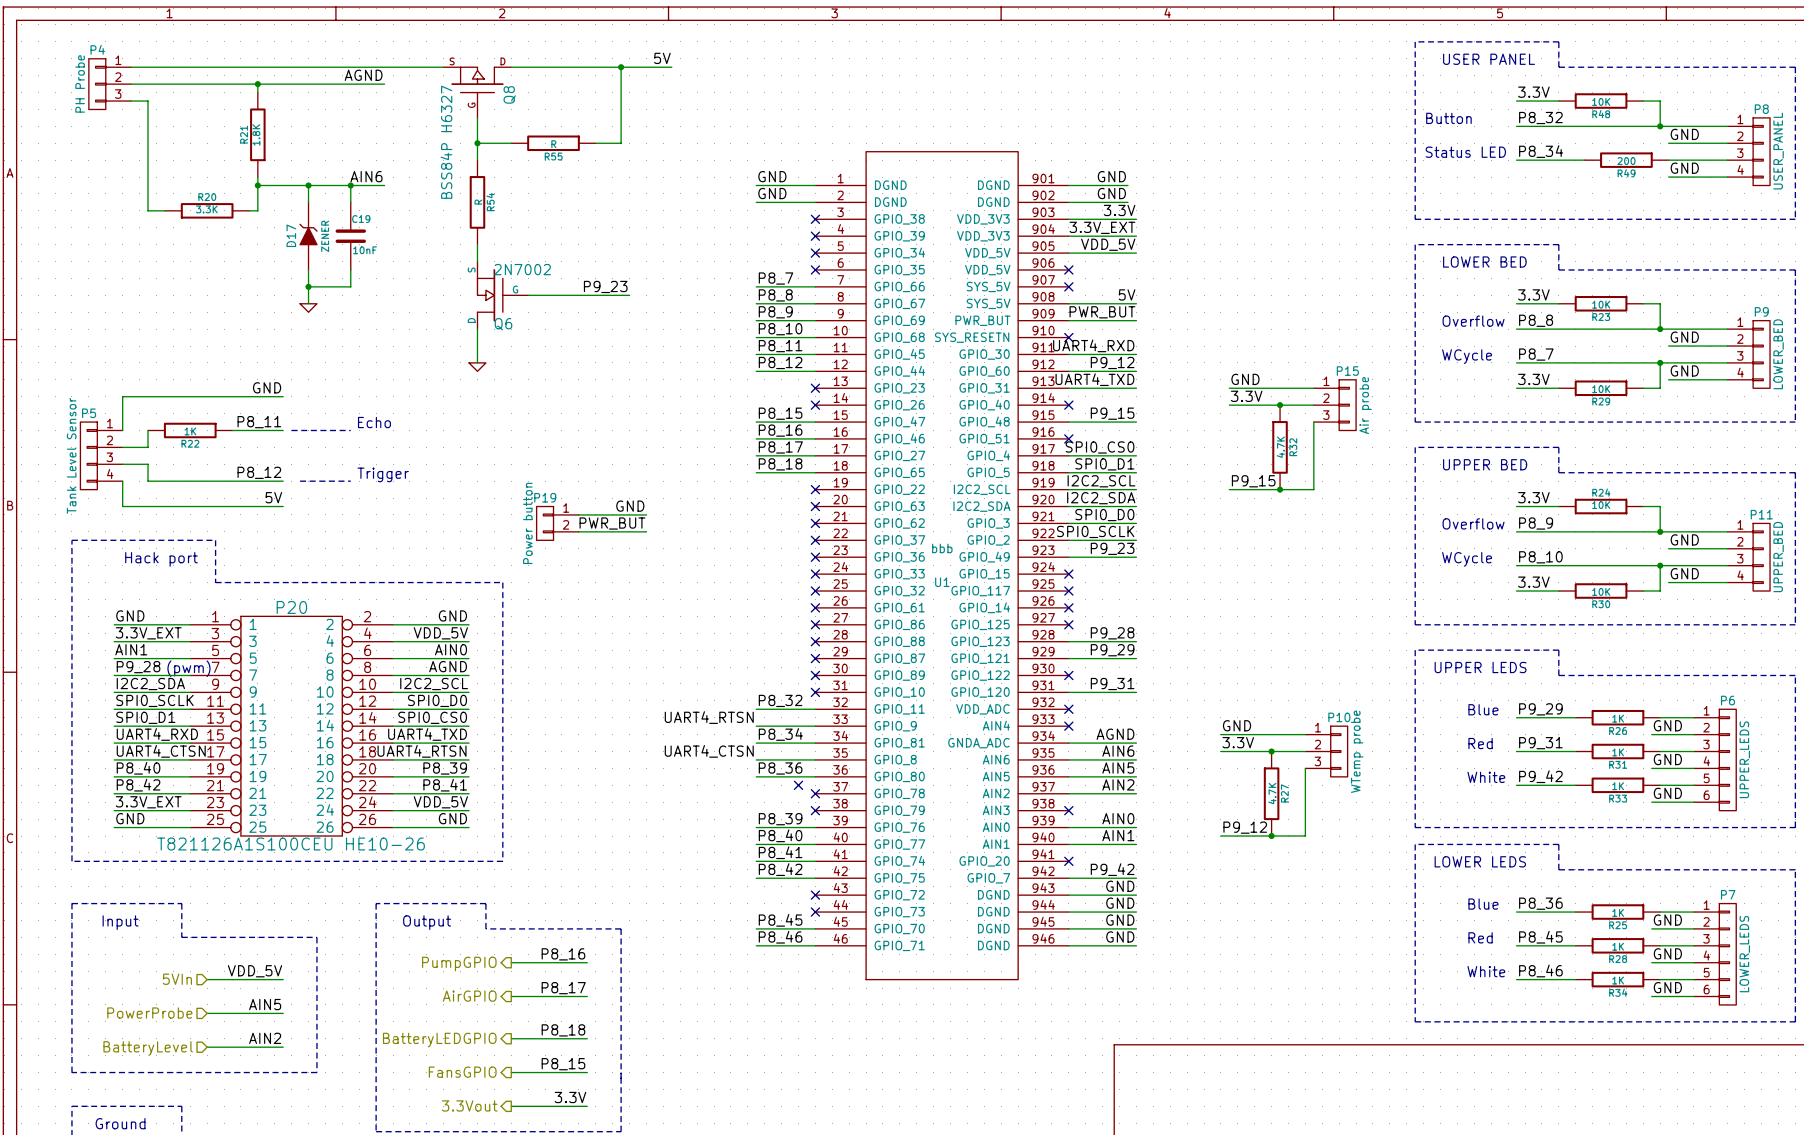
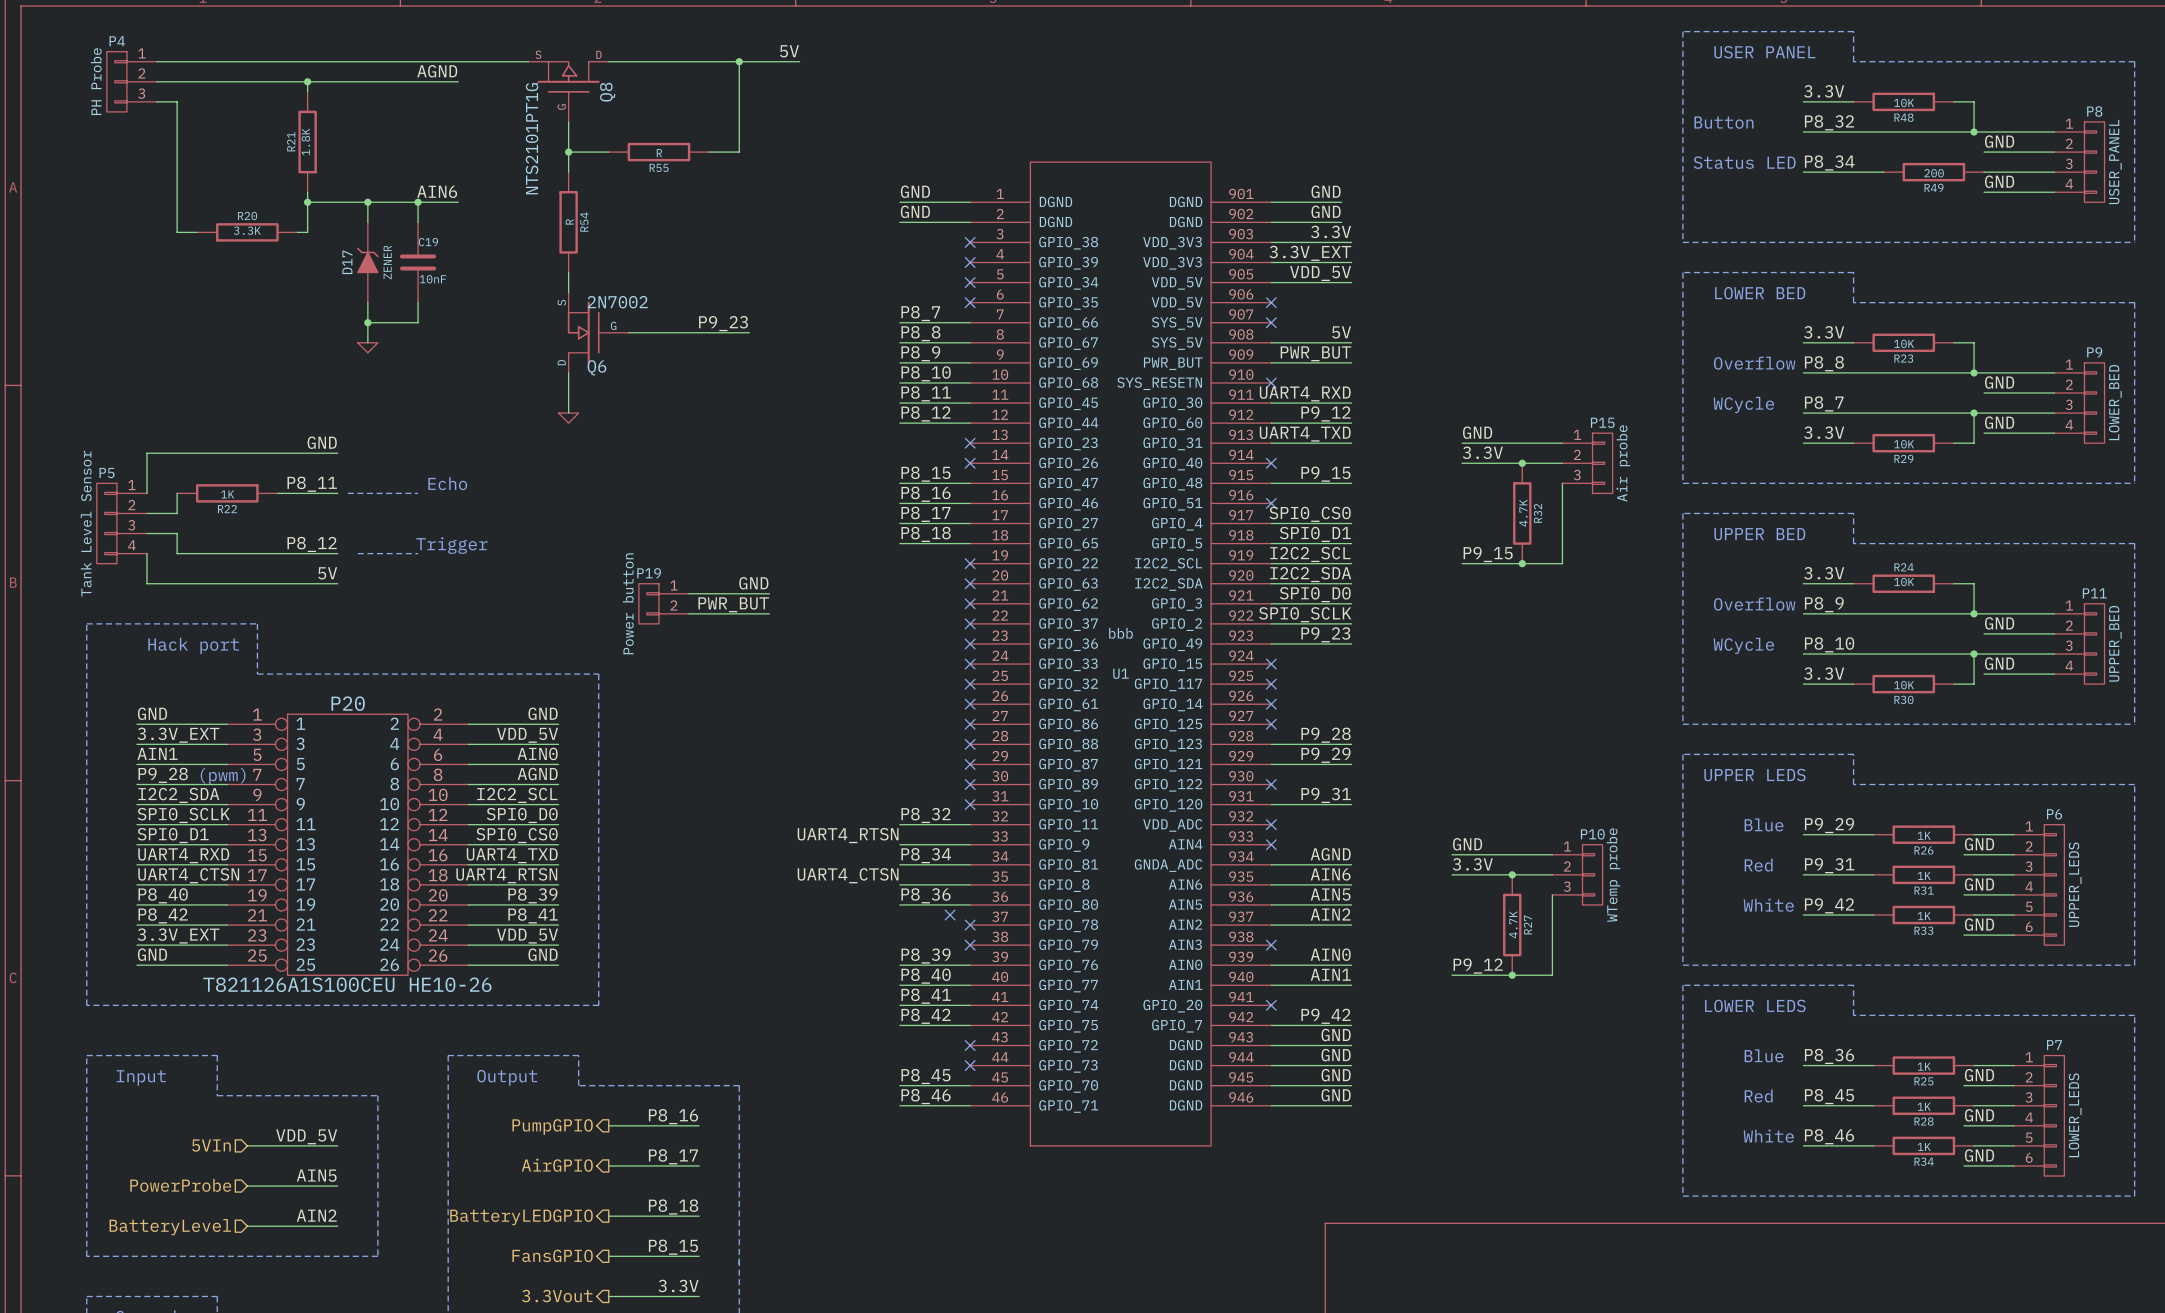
Q8 value: BSS84P H6327 (446, 142) -> NTS2101PT1G (532, 138)

